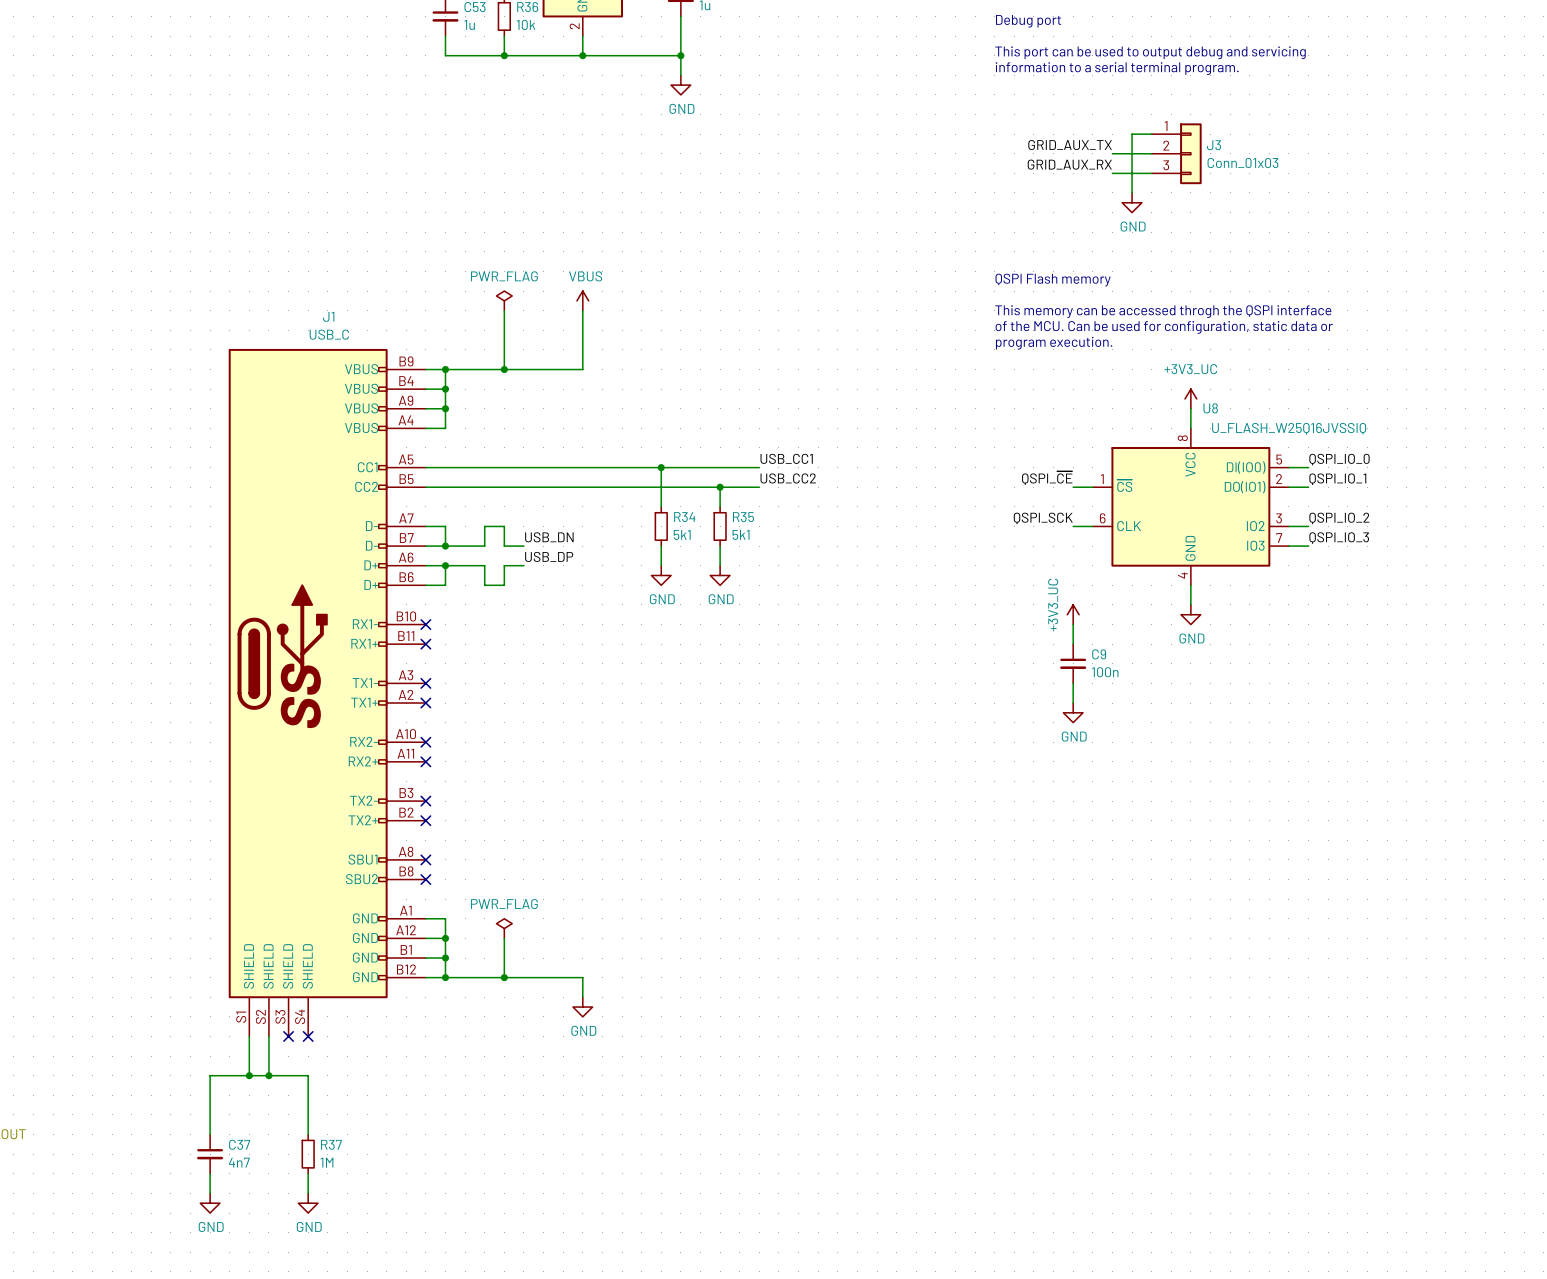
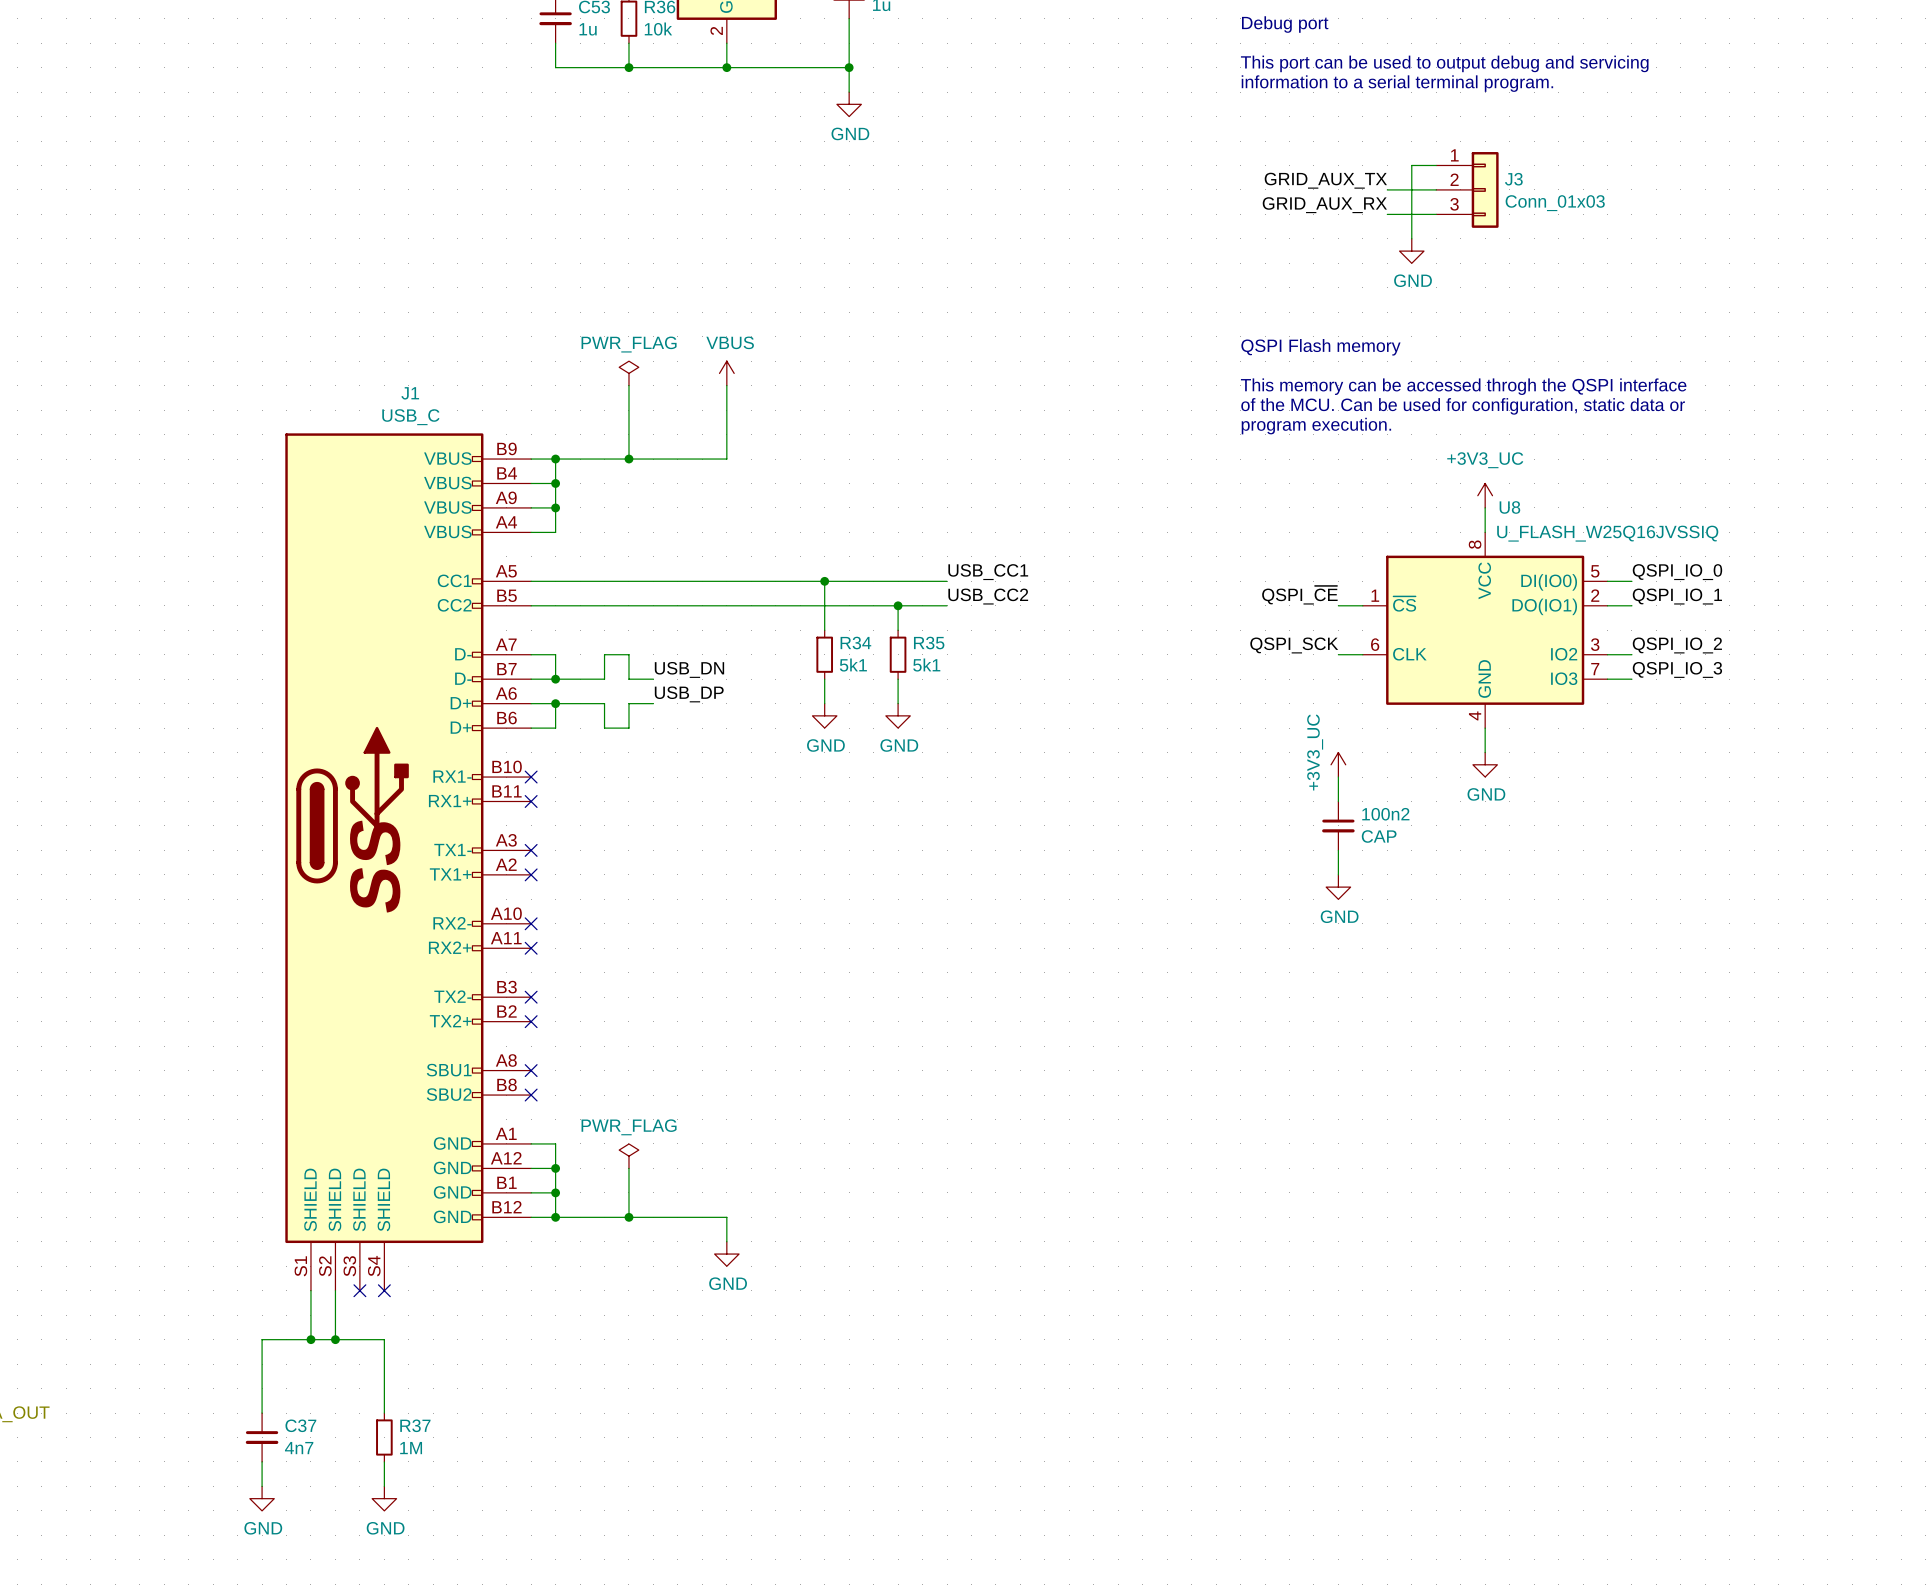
C9 name: C9 (1099, 654) -> 100n2 (1385, 814)
C9 value: 100n (1105, 672) -> CAP (1379, 836)

